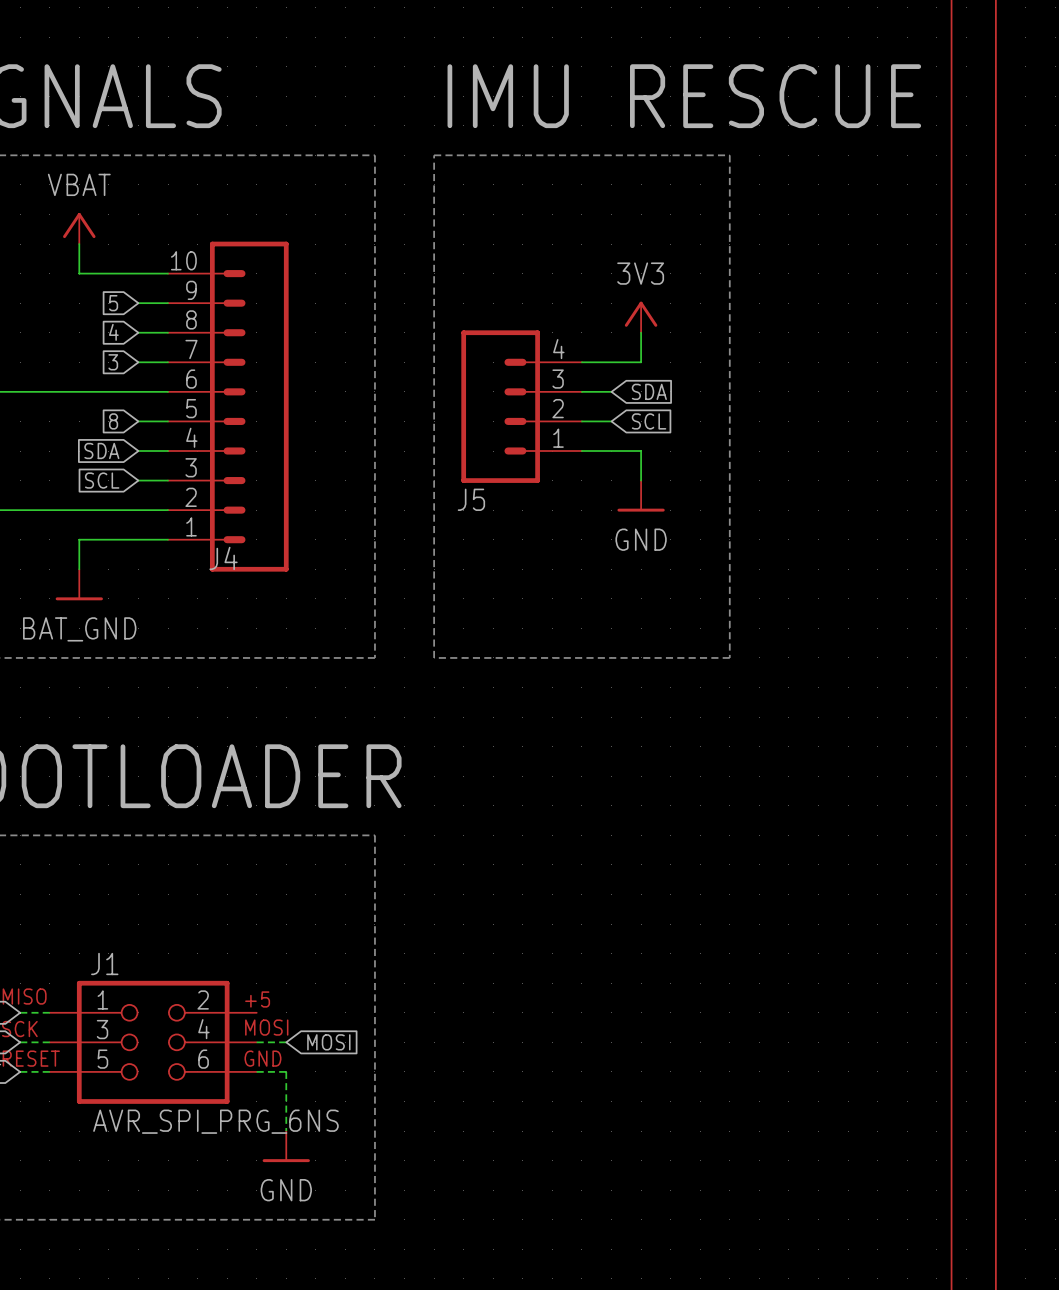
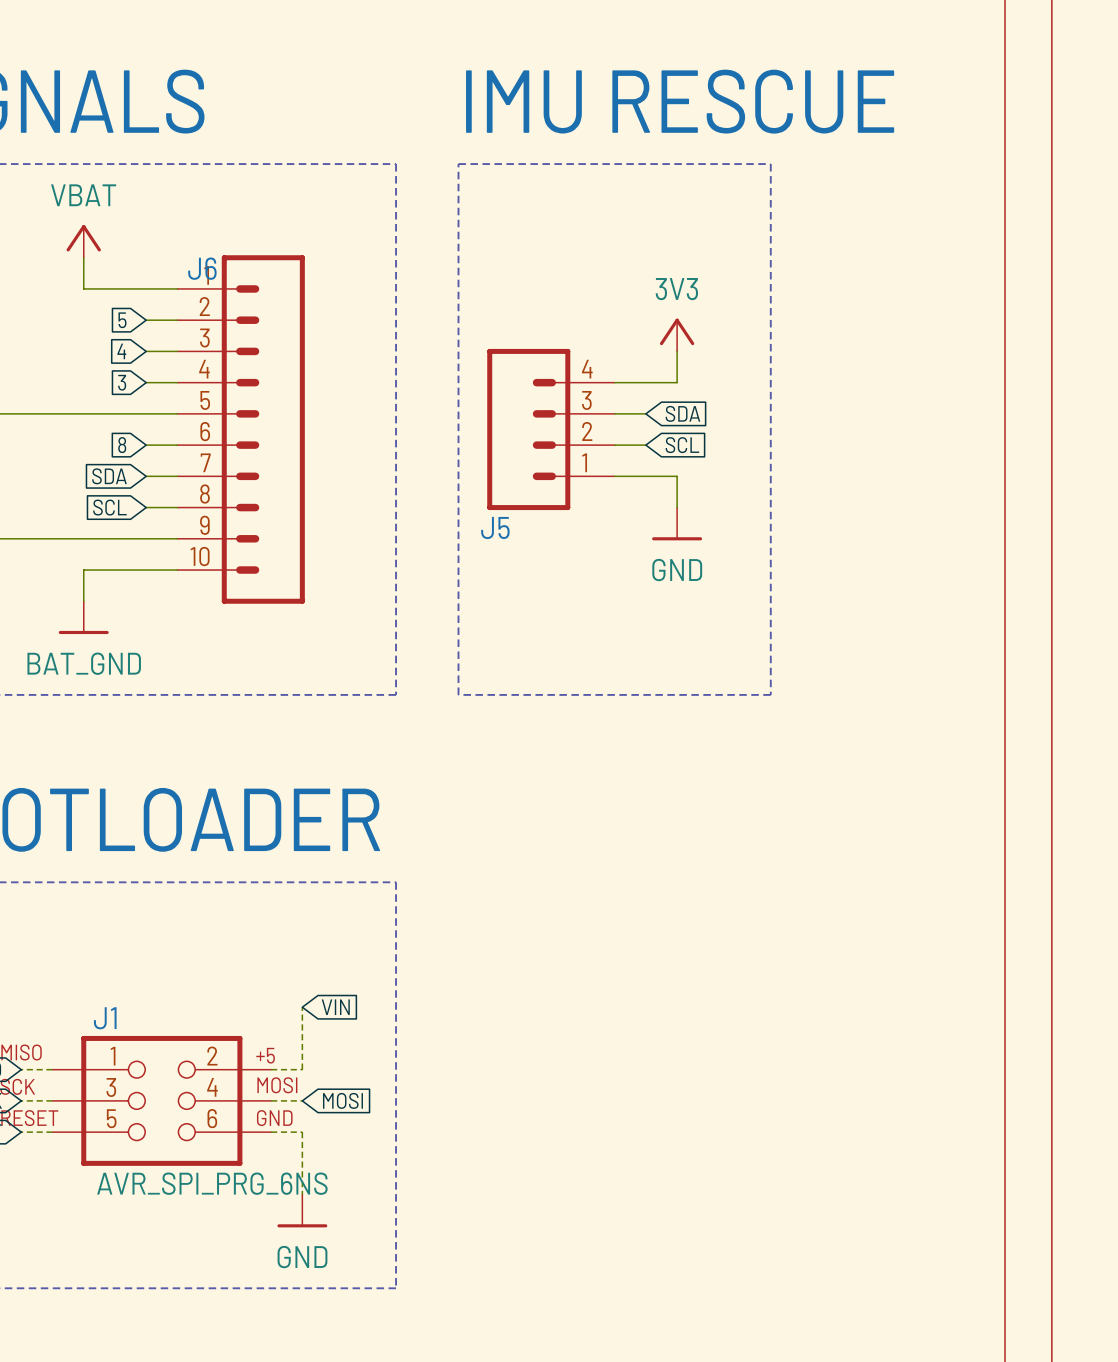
J4 flip: as is (249, 406) -> up-down (263, 429)
J4 name: J4 (223, 558) -> J6 (202, 268)
wire: none -> (302, 1007) (302, 1069) (271, 1069)
global label: none -> VIN (335, 1007)

